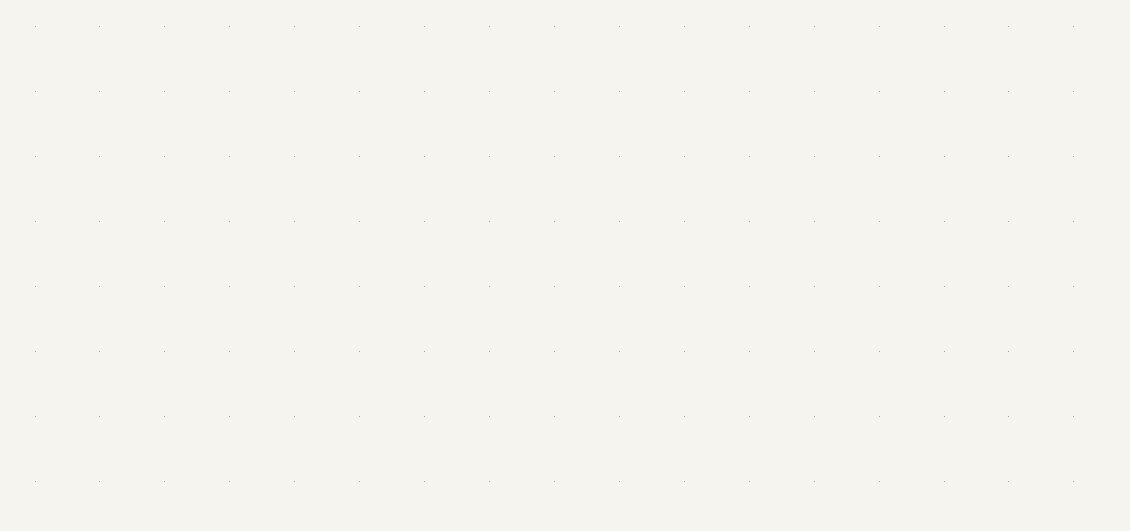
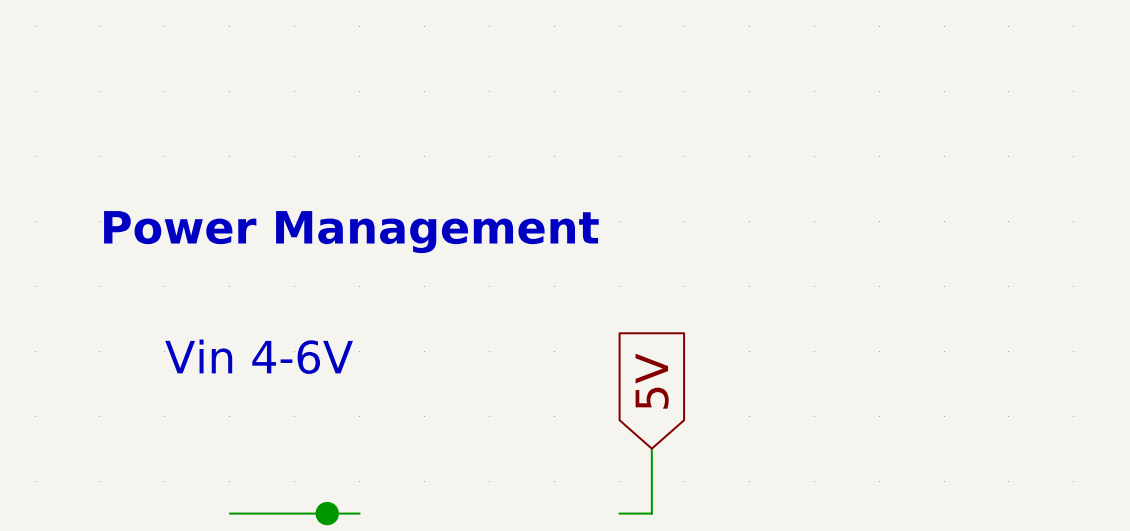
text: none -> Power Management (351, 232)
text: none -> Vin 4-6V (259, 356)
global label: none -> 5V (652, 381)
wire: none -> (651, 448) (651, 513) (619, 513)
wire: none -> (229, 513) (359, 513)
junction: none -> (327, 513)

